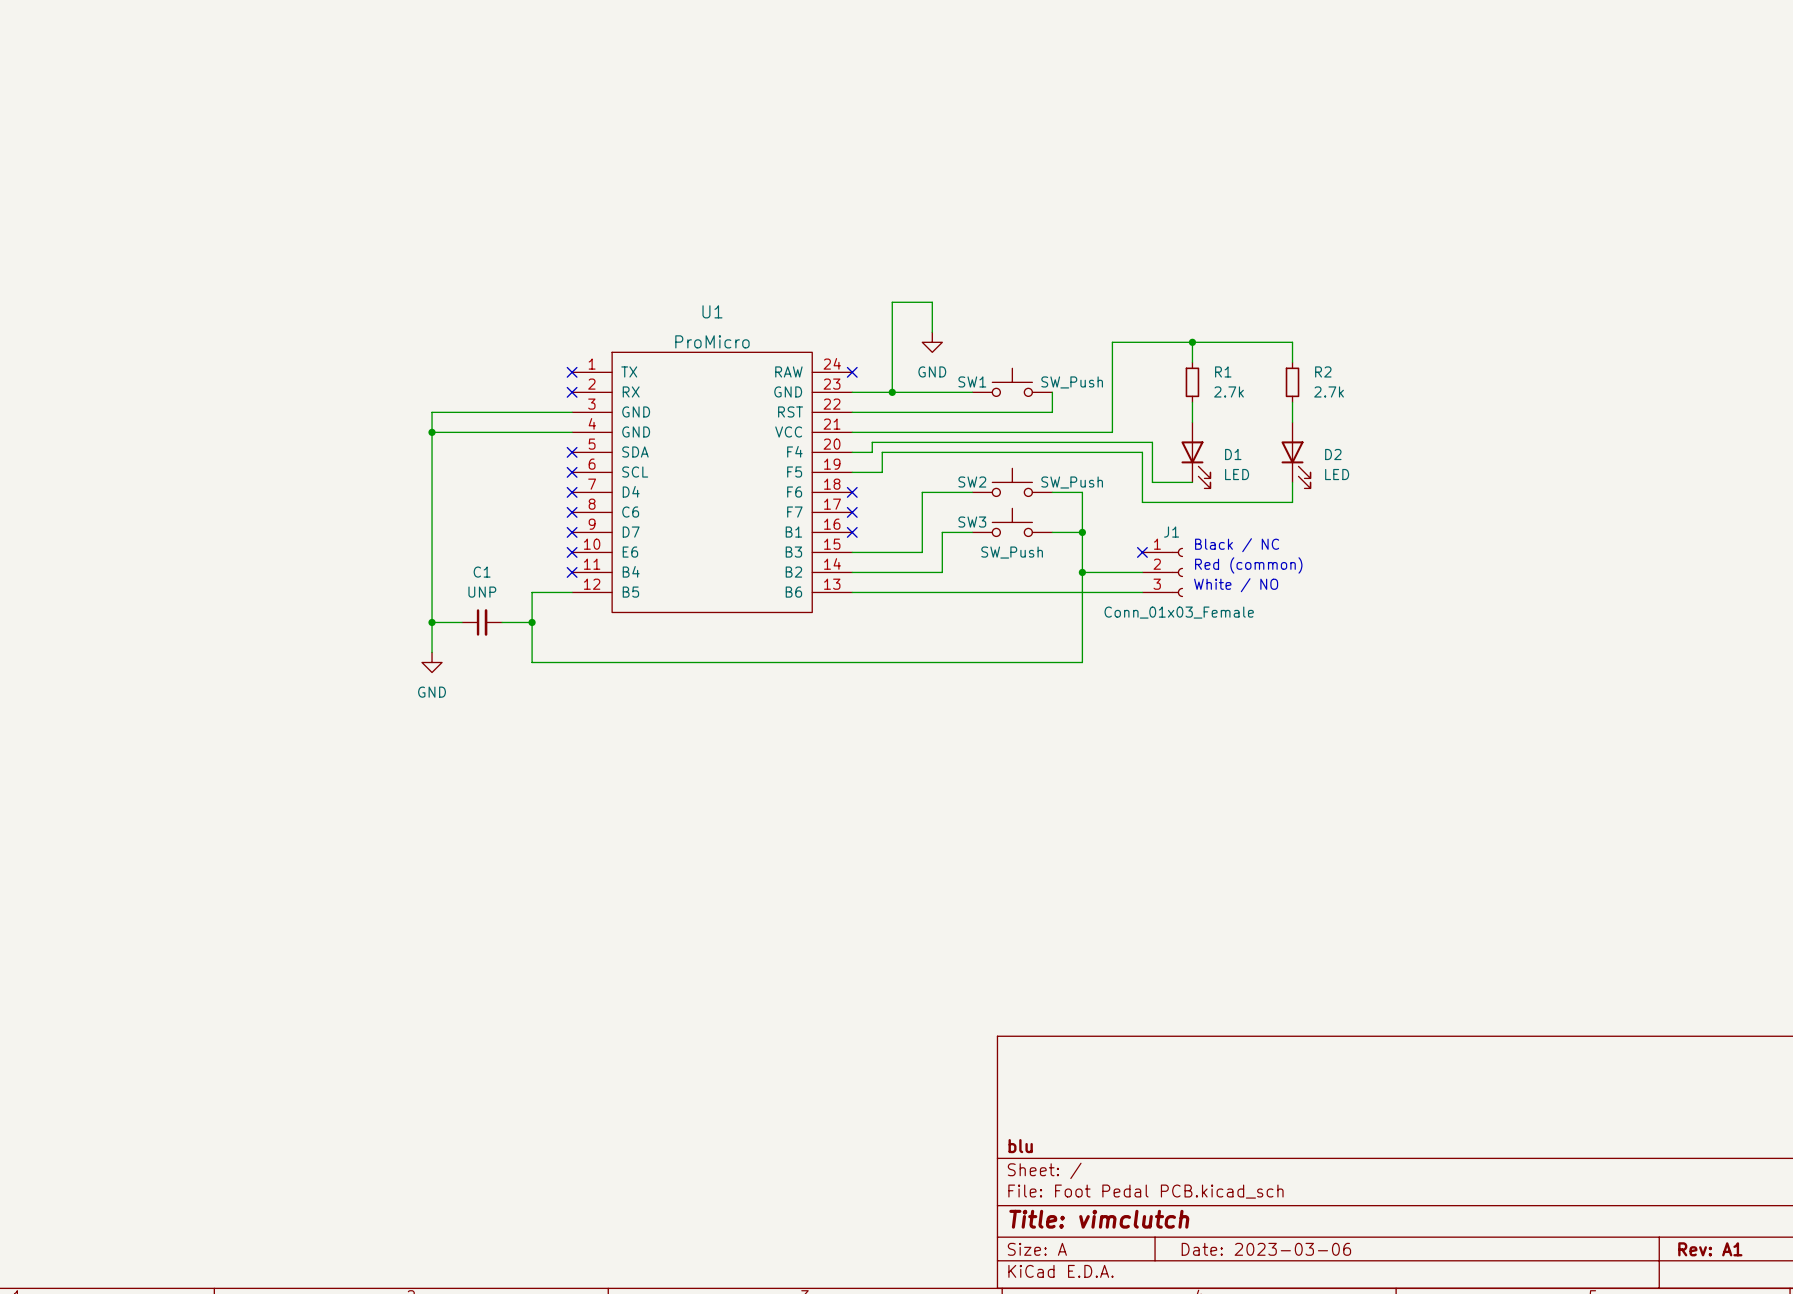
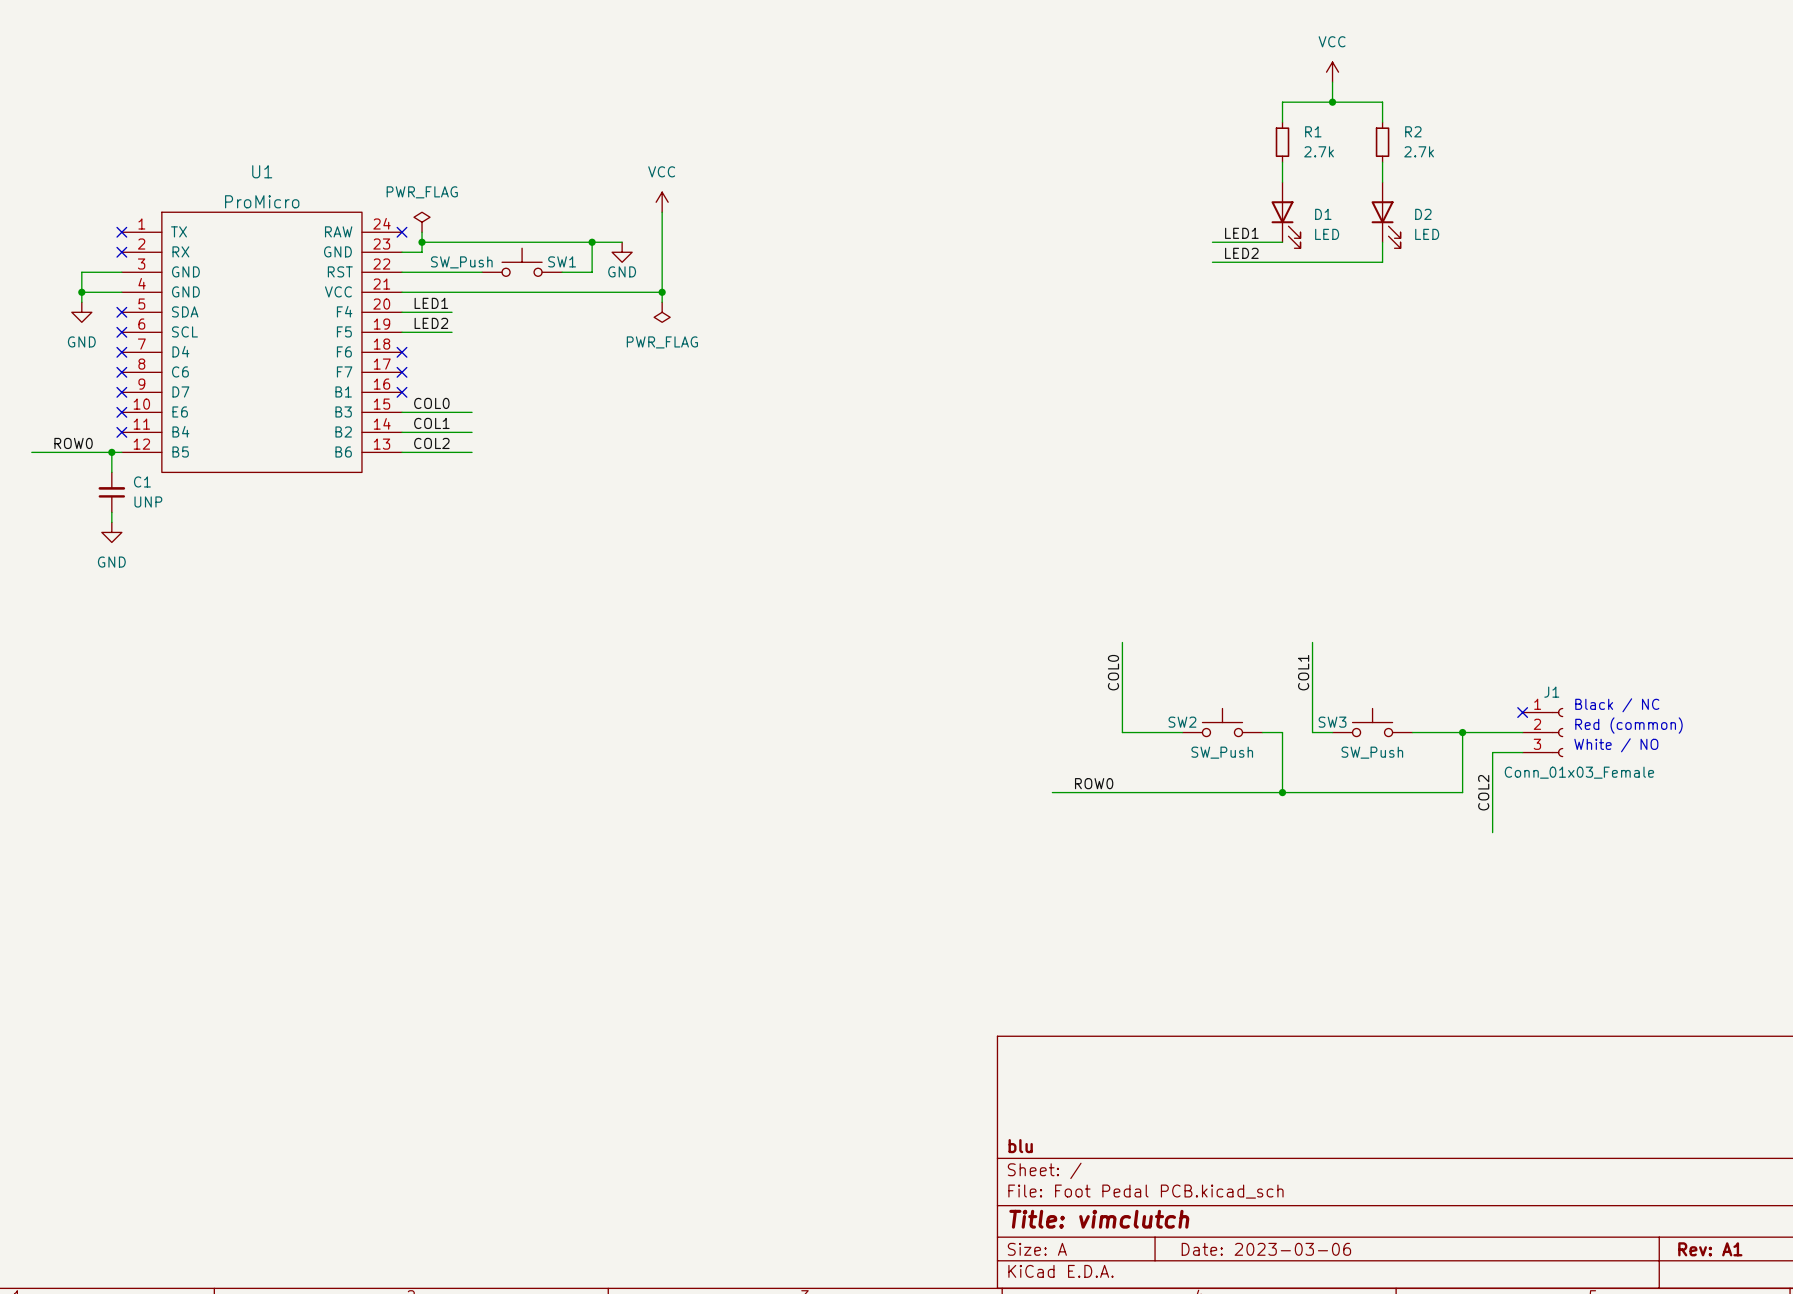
power symbol: none -> VCC (1332, 72)
wire: none -> (1332, 82) (1332, 102)
junction: none -> (1332, 102)
wire: none -> (1282, 122) (1282, 102) (1382, 102) (1382, 122)
wire: none -> (1282, 162) (1282, 182)
wire: none -> (1382, 162) (1382, 182)
power symbol: none -> VCC (662, 202)
wire: none -> (662, 212) (662, 302)
power symbol: none -> PWR_FLAG (422, 222)
no-connect mark: none -> (121, 232)
no-connect mark: none -> (402, 232)
wire: none -> (422, 232) (422, 252) (402, 252)
label: none -> LED1 (1241, 233)
wire: none -> (422, 242) (622, 242)
junction: none -> (422, 242)
wire: none -> (592, 242) (592, 272) (562, 272)
junction: none -> (592, 242)
wire: none -> (1212, 242) (1282, 242)
wire: none -> (1382, 242) (1382, 262) (1212, 262)
no-connect mark: none -> (121, 252)
power symbol: none -> GND (622, 252)
label: none -> LED2 (1241, 253)
wire: none -> (121, 272) (81, 272) (81, 302)
wire: none -> (402, 272) (482, 272)
wire: none -> (81, 292) (121, 292)
junction: none -> (81, 292)
wire: none -> (402, 292) (662, 292)
junction: none -> (662, 292)
label: none -> LED1 (431, 303)
power symbol: none -> GND (81, 312)
no-connect mark: none -> (121, 312)
wire: none -> (402, 312) (452, 312)
power symbol: none -> PWR_FLAG (662, 312)
label: none -> LED2 (431, 323)
no-connect mark: none -> (121, 332)
wire: none -> (402, 332) (452, 332)
wire: (932, 332) (932, 302) (892, 302) (892, 392) -> none
power symbol: GND (932, 342) -> none
wire: (1192, 342) (1192, 362) -> none
junction: (1192, 342) -> none
no-connect mark: none -> (121, 352)
no-connect mark: none -> (402, 352)
wire: (1292, 362) (1292, 342) (1112, 342) (1112, 432) (852, 432) -> none
no-connect mark: none -> (121, 372)
no-connect mark: none -> (402, 372)
no-connect mark: (572, 372) -> none
no-connect mark: (852, 372) -> none
SW1 name position: SW1 (972, 381) -> SW1 (562, 261)
SW1 position: (1012, 382) -> (522, 262)
SW1 value position: SW_Push (1072, 382) -> SW_Push (461, 262)
R1 position: (1192, 382) -> (1282, 142)
R2 position: (1292, 382) -> (1382, 142)
no-connect mark: none -> (121, 392)
no-connect mark: none -> (402, 392)
no-connect mark: (572, 392) -> none
wire: (852, 392) (972, 392) -> none
junction: (892, 392) -> none
wire: (1052, 392) (1052, 412) (852, 412) -> none
wire: (1192, 402) (1192, 422) -> none
wire: (1292, 402) (1292, 422) -> none
label: none -> COL0 (431, 403)
no-connect mark: none -> (121, 412)
wire: (432, 412) (432, 652) -> (432, 412) (402, 412)
wire: (472, 412) (572, 412) -> none
label: none -> COL1 (431, 423)
no-connect mark: none -> (121, 432)
junction: (432, 432) -> none
wire: (472, 432) (572, 432) -> none
label: none -> ROW0 (73, 443)
label: none -> COL2 (431, 443)
wire: none -> (31, 452) (121, 452)
wire: none -> (111, 452) (111, 472)
junction: none -> (111, 452)
wire: none -> (402, 452) (472, 452)
no-connect mark: (572, 452) -> none
wire: (852, 452) (872, 452) (872, 442) (1152, 442) (1152, 482) (1192, 482) -> none
D1 position: (1195, 455) -> (1286, 215)
D2 position: (1296, 455) -> (1386, 215)
no-connect mark: (572, 472) -> none
wire: (852, 472) (882, 472) (882, 452) (1142, 452) (1142, 502) (1292, 502) (1292, 482) -> none
U1 position: (712, 482) -> (261, 342)
SW2 position: (1012, 482) -> (1222, 722)
SW2 value position: SW_Push (1072, 482) -> SW_Push (1222, 752)
no-connect mark: (572, 492) -> none
no-connect mark: (852, 492) -> none
wire: (972, 492) (922, 492) (922, 552) (852, 552) -> none
wire: (1052, 492) (1082, 492) (1082, 662) (532, 662) (532, 592) (572, 592) -> none
wire: none -> (111, 512) (111, 522)
no-connect mark: (572, 512) -> none
no-connect mark: (852, 512) -> none
SW3 position: (1012, 522) -> (1372, 722)
power symbol: none -> GND (111, 532)
no-connect mark: (572, 532) -> none
no-connect mark: (852, 532) -> none
wire: (972, 532) (942, 532) (942, 572) (852, 572) -> none
wire: (1052, 532) (1082, 532) -> none
junction: (1082, 532) -> none
text: Black / NC (1237, 545) -> none
no-connect mark: (572, 552) -> none
no-connect mark: (1142, 552) -> none
text: Red (common) (1248, 565) -> none
C1 name position: C1 (482, 572) -> C1 (142, 481)
no-connect mark: (572, 572) -> none
wire: (1082, 572) (1142, 572) -> none
junction: (1082, 572) -> none
J1 position: (1162, 572) -> (1542, 732)
text: White / NO (1236, 585) -> none
C1 value position: UNP (482, 592) -> UNP (148, 501)
wire: (852, 592) (1142, 592) -> none
J1 value position: Conn_01x03_Female (1179, 612) -> Conn_01x03_Female (1579, 772)
wire: (432, 622) (462, 622) -> (402, 432) (432, 432)
junction: (432, 622) -> none
C1 rotation: 0° (482, 622) -> 90° counterclockwise (111, 492)
C1 position: (482, 622) -> (111, 492)
wire: (502, 622) (532, 622) -> none
junction: (532, 622) -> none
wire: none -> (1122, 642) (1122, 732) (1182, 732)
wire: none -> (1312, 642) (1312, 732) (1332, 732)
power symbol: GND (432, 662) -> none
label: none -> COL0 (1113, 672)
label: none -> COL1 (1303, 672)
text: none -> Black / NC (1617, 705)
no-connect mark: none -> (1522, 712)
text: none -> Red (common) (1628, 725)
wire: none -> (1262, 732) (1282, 732) (1282, 792)
wire: none -> (1412, 732) (1522, 732)
wire: none -> (1462, 732) (1462, 792) (1052, 792)
junction: none -> (1462, 732)
text: none -> White / NO (1616, 745)
wire: none -> (1522, 752) (1492, 752) (1492, 832)
label: none -> ROW0 (1094, 783)
junction: none -> (1282, 792)
label: none -> COL2 (1483, 792)

